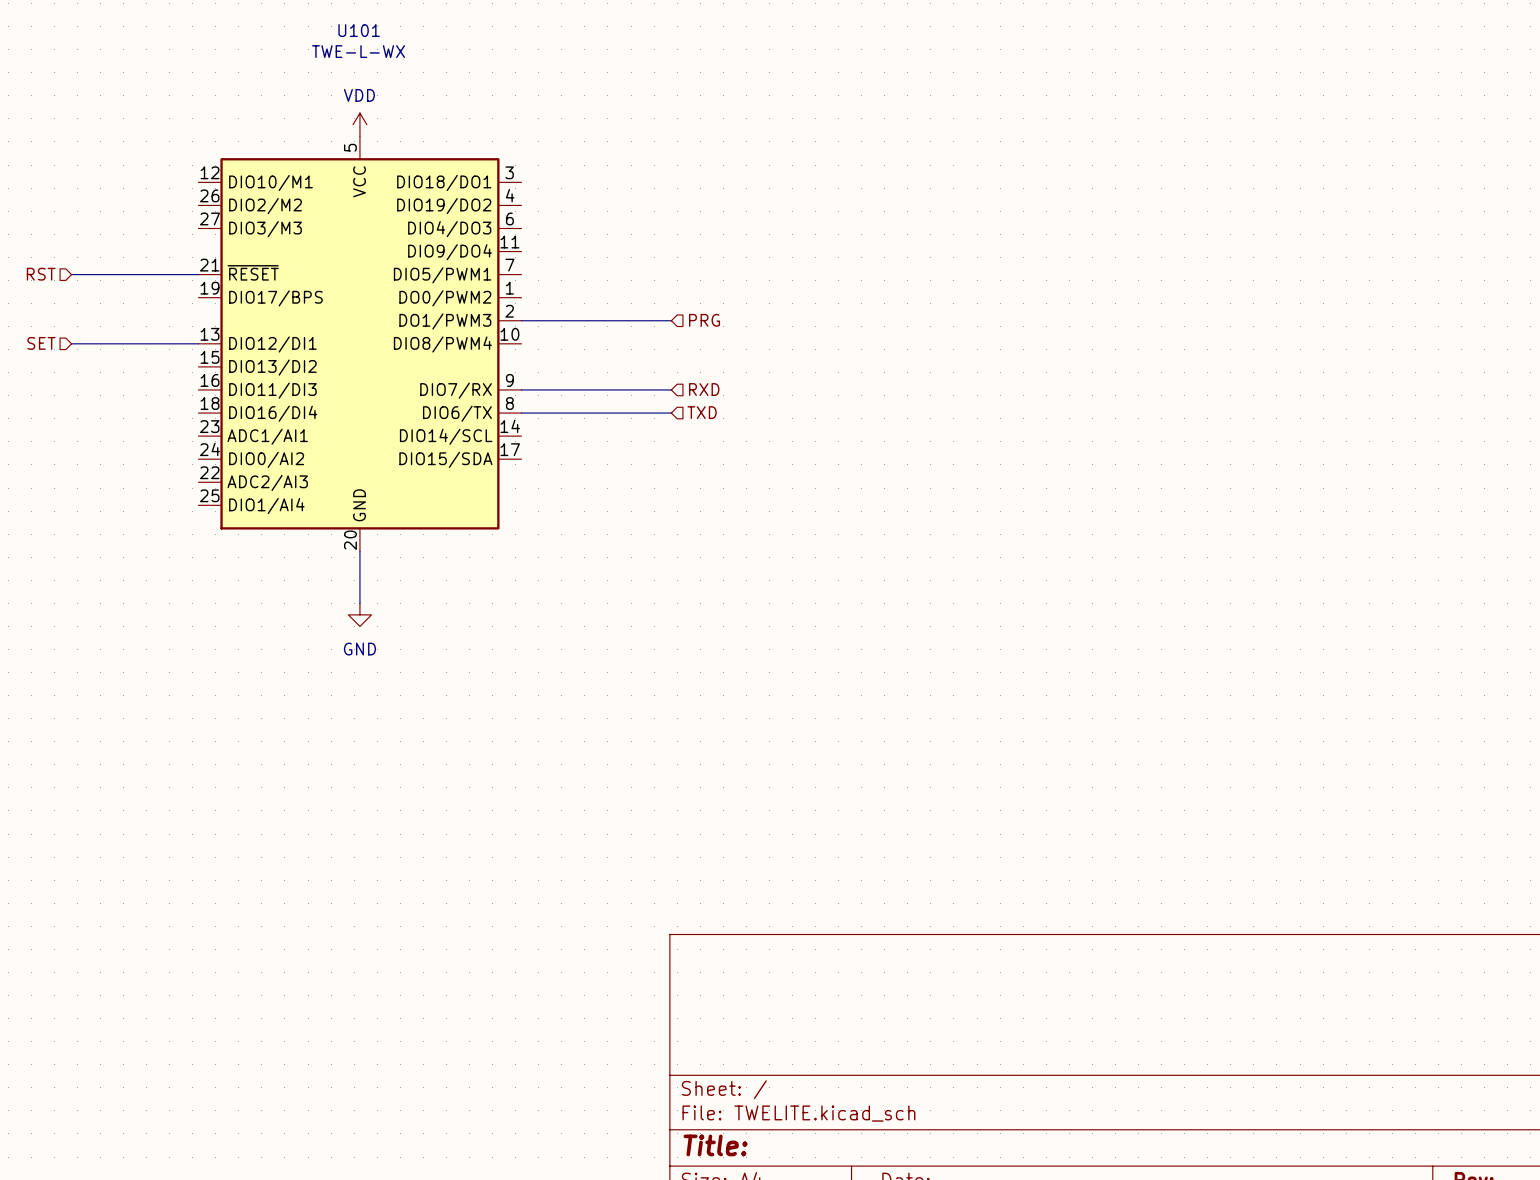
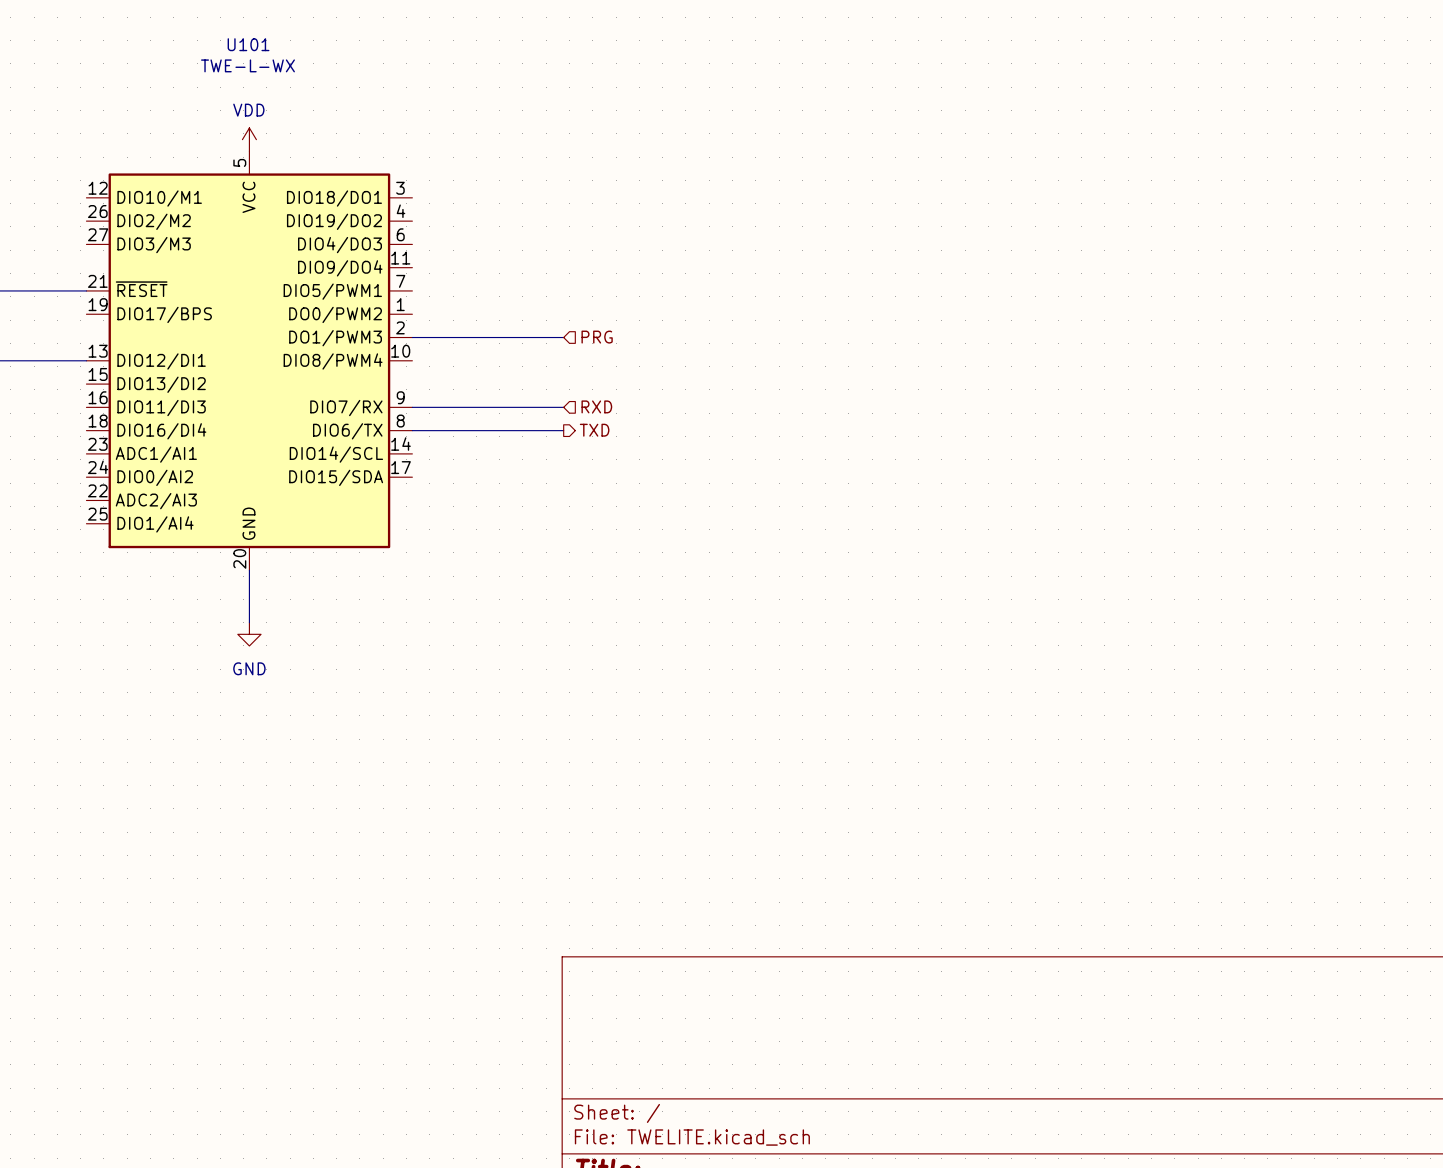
hierarchical label shape: input (702, 412) -> output (594, 430)

